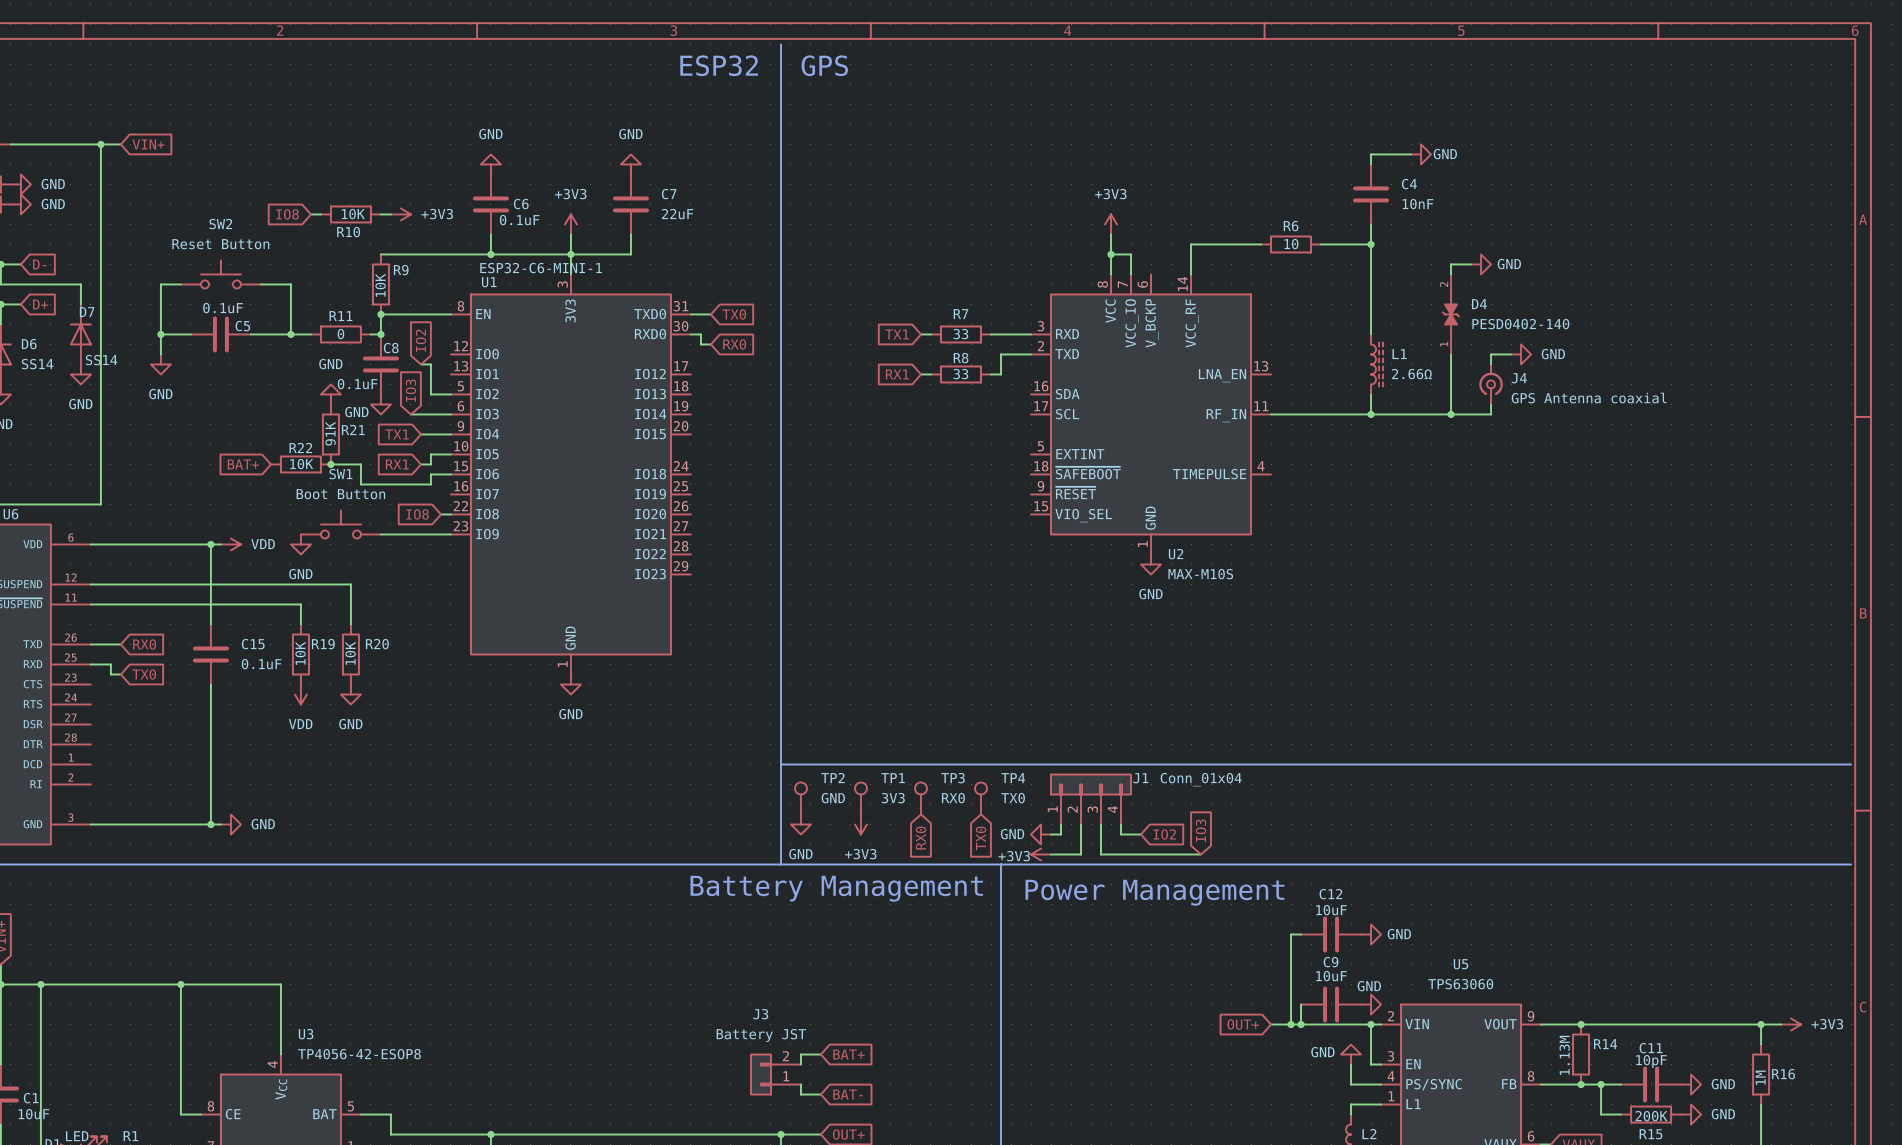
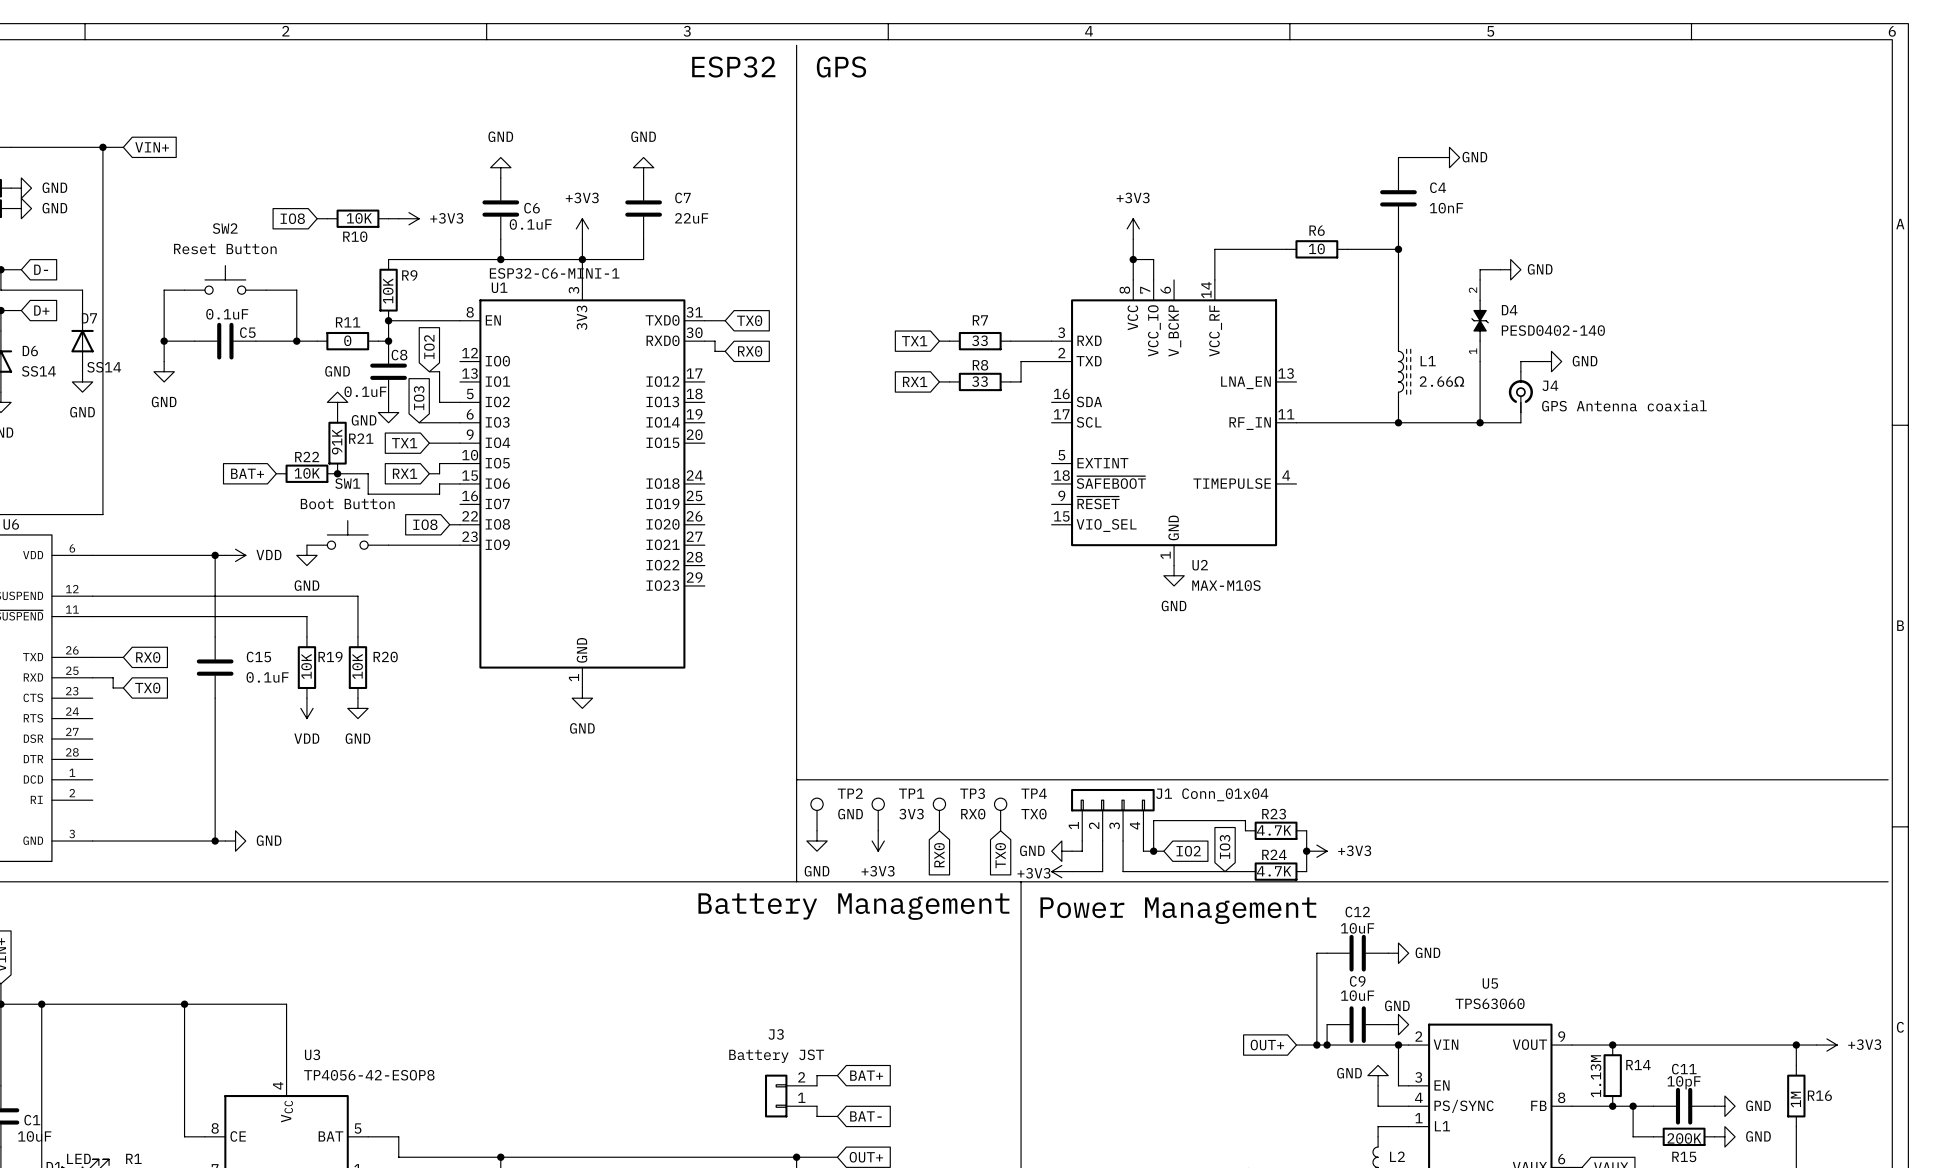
wire: none -> (1245, 830) (1245, 820) (1153, 820) (1153, 851)
R23: none -> 4.7K (1276, 830)
wire: none -> (1306, 830) (1306, 871)
junction: none -> (1153, 851)
junction: none -> (1306, 851)
power symbol: none -> +3V3 (1316, 851)
wire: none -> (1225, 871) (1245, 871)
R24: none -> 4.7K (1276, 871)

